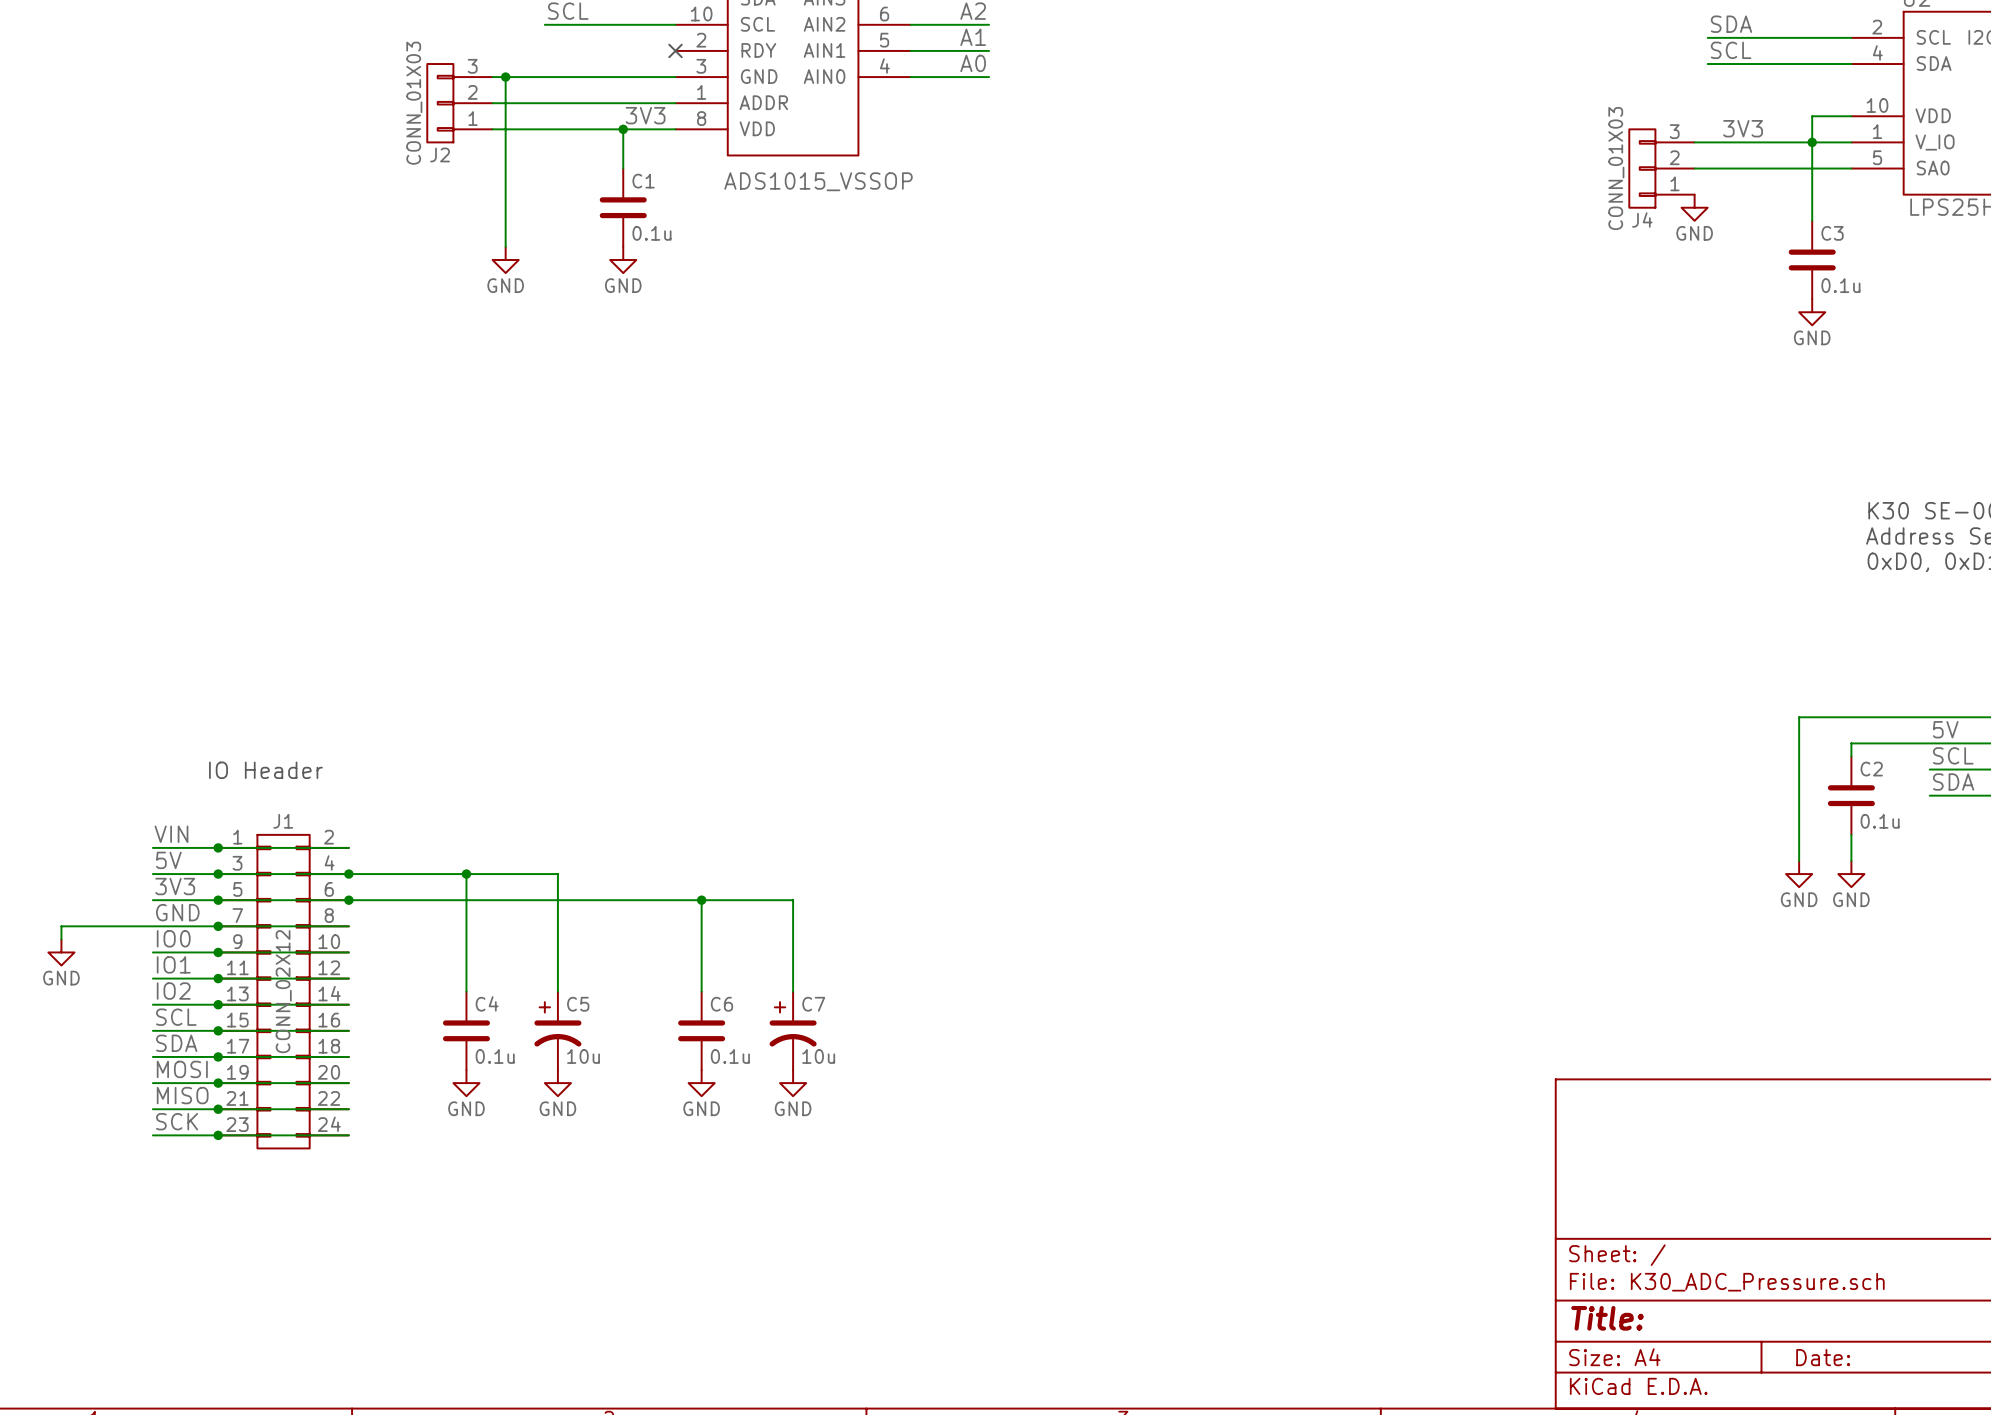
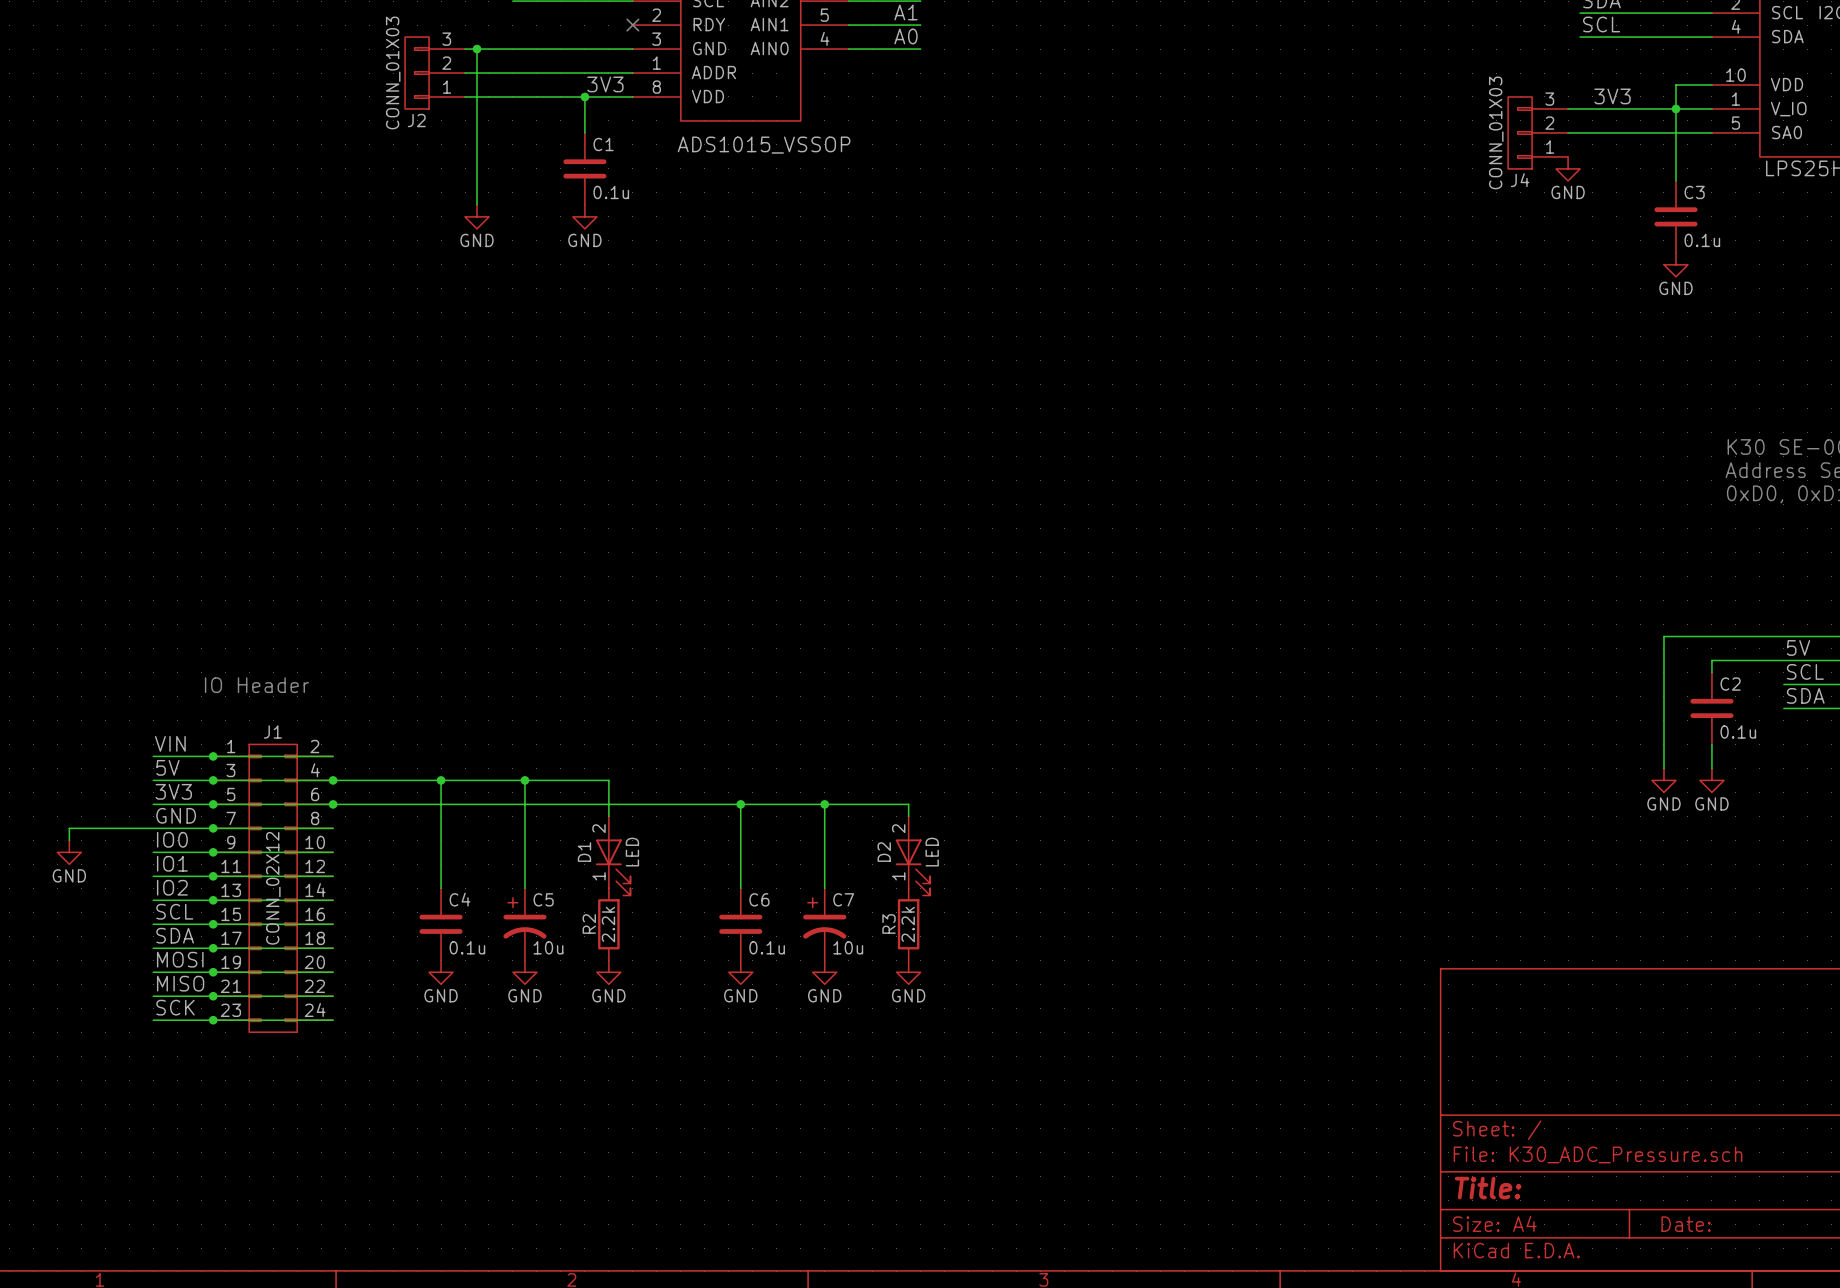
wire: none -> (524, 780) (608, 780) (608, 816)
junction: none -> (524, 780)
wire: (701, 900) (701, 991) -> (824, 804) (824, 888)
junction: (701, 900) -> none
wire: none -> (740, 804) (908, 804) (908, 816)
junction: none -> (740, 804)
junction: none -> (824, 804)
D1: none -> LED (613, 855)
D2: none -> LED (912, 855)
R2: none -> 2.2k (608, 924)
C6 position: (701, 1030) -> (740, 924)
C7 position: (793, 1030) -> (824, 924)
R3: none -> 2.2k (908, 924)
power symbol position: GND (701, 1083) -> GND (608, 972)
power symbol: none -> GND (824, 972)
power symbol: none -> GND (908, 972)

